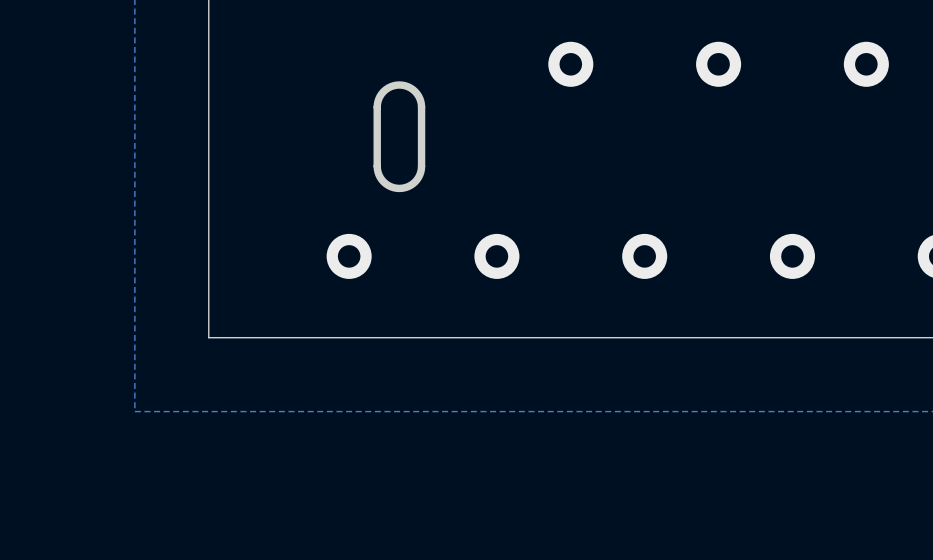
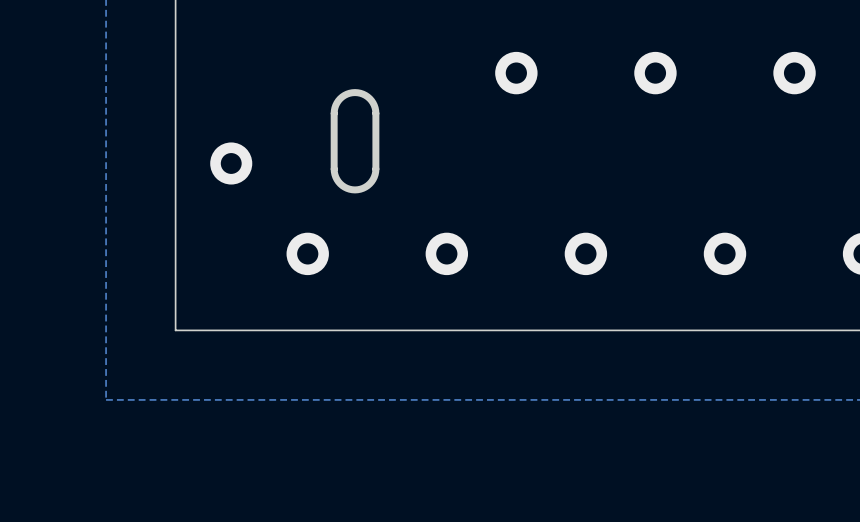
via: none -> (231, 163)

